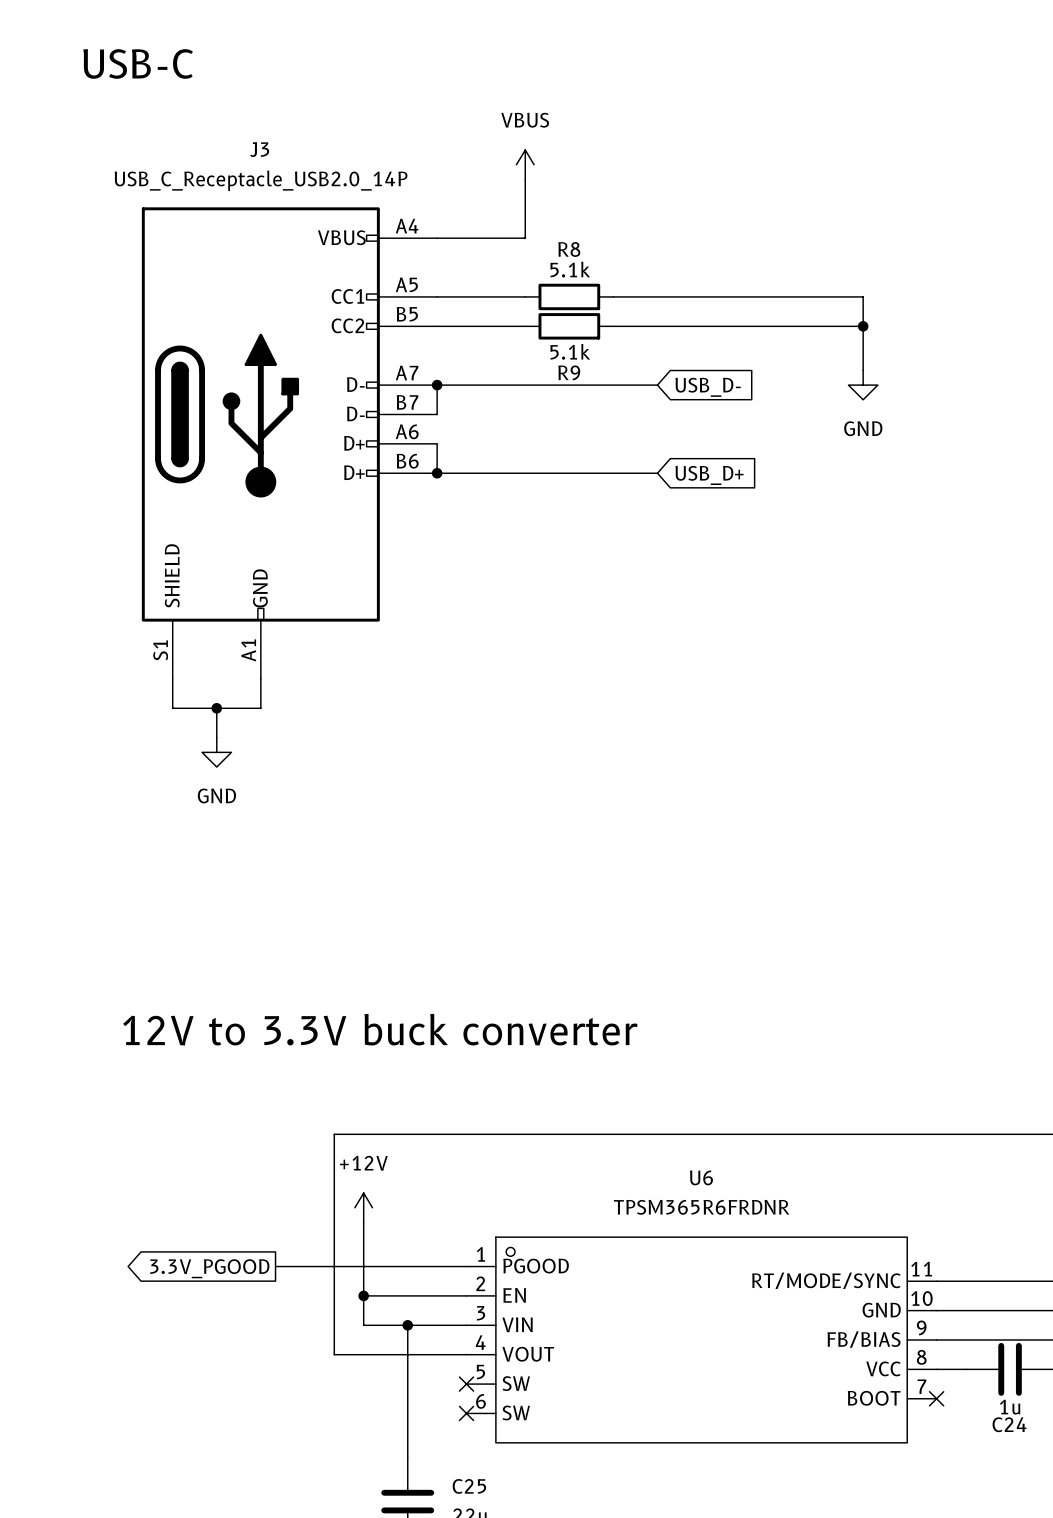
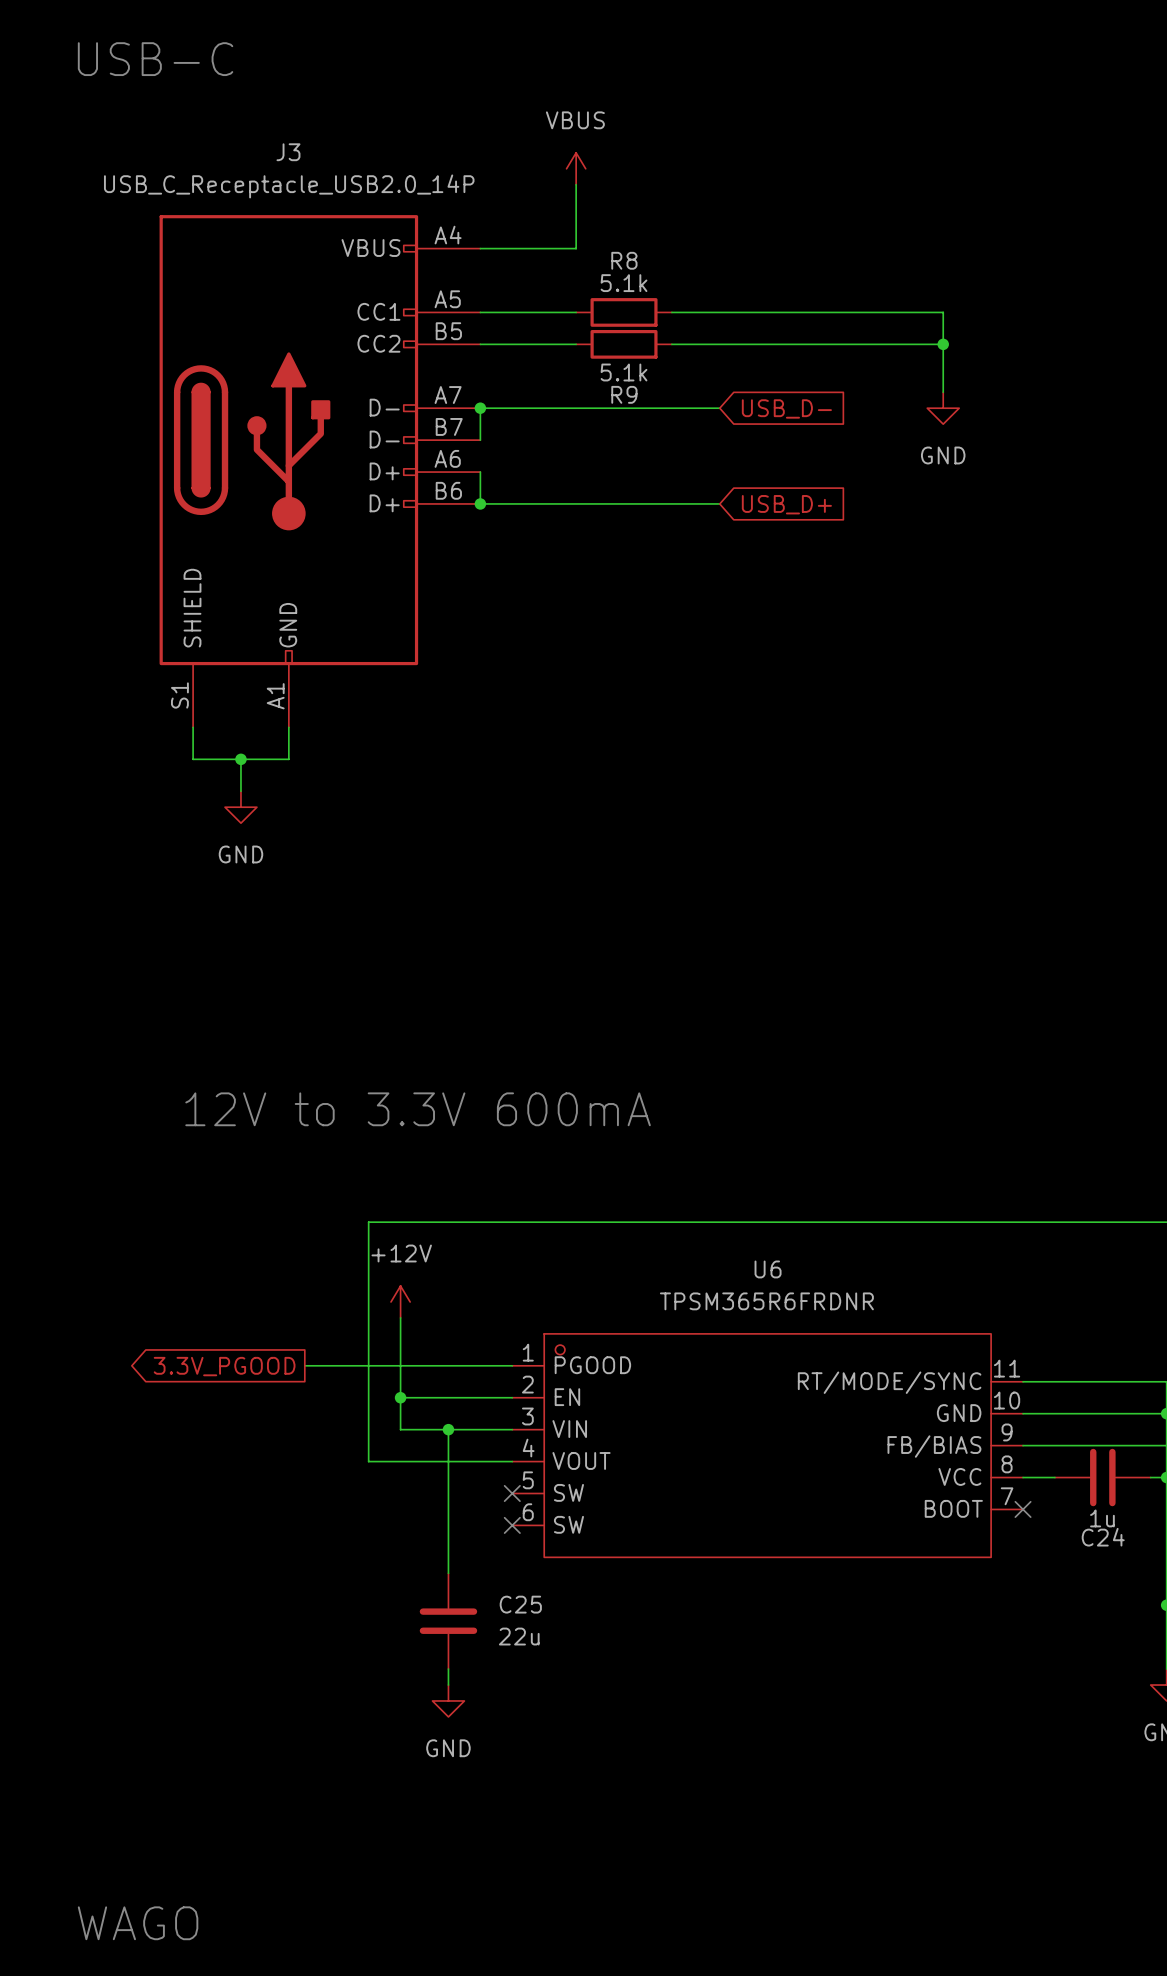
text: 12V to 3.3V buck converter (380, 1029) -> 12V to 3.3V 600mA (418, 1109)

